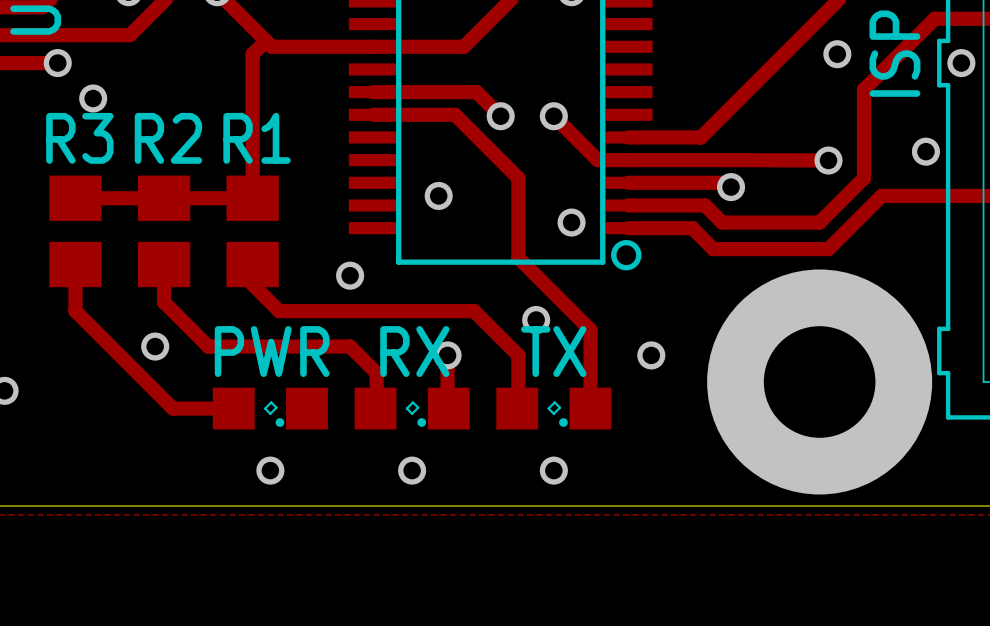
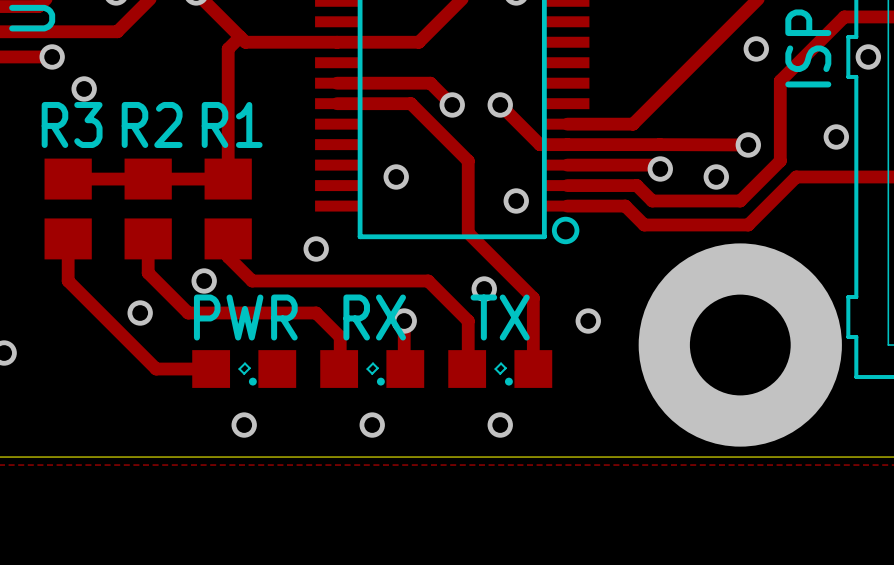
via: none -> (716, 176)
via: none -> (204, 281)

